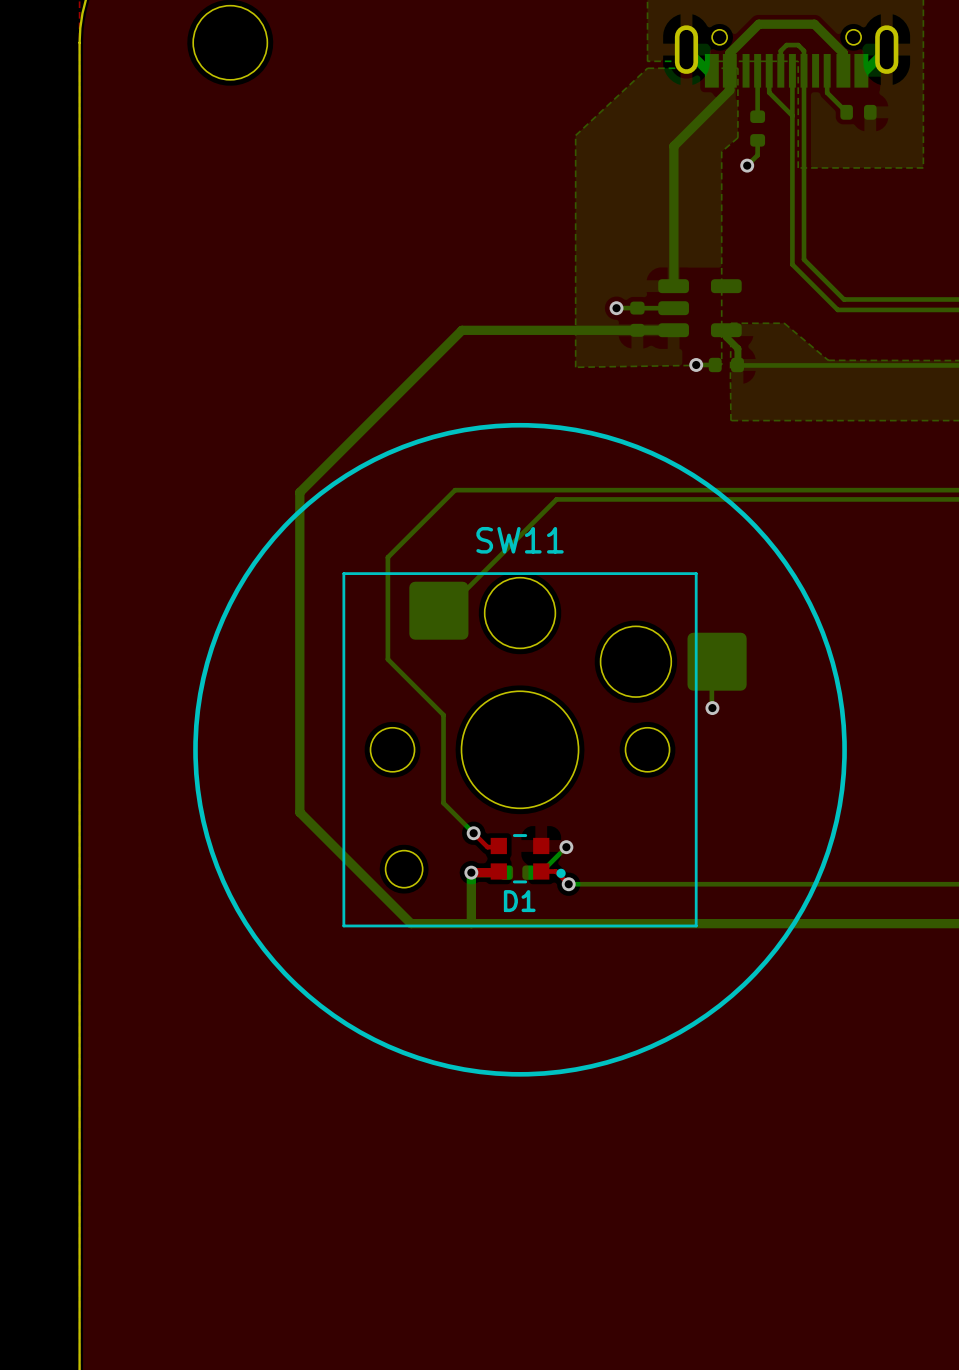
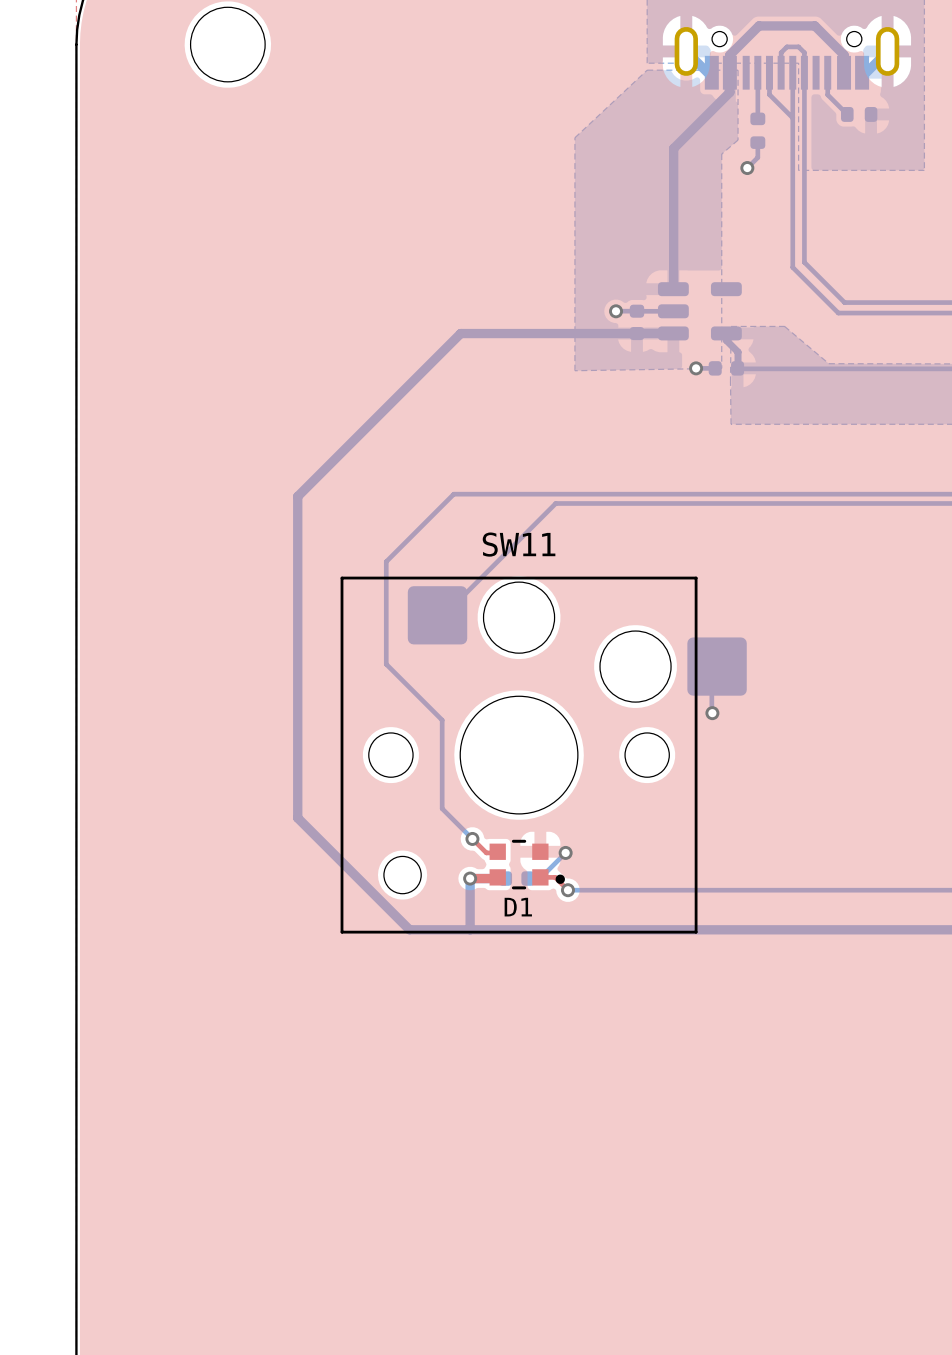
drawing: [193, 422, 847, 1077] -> none

